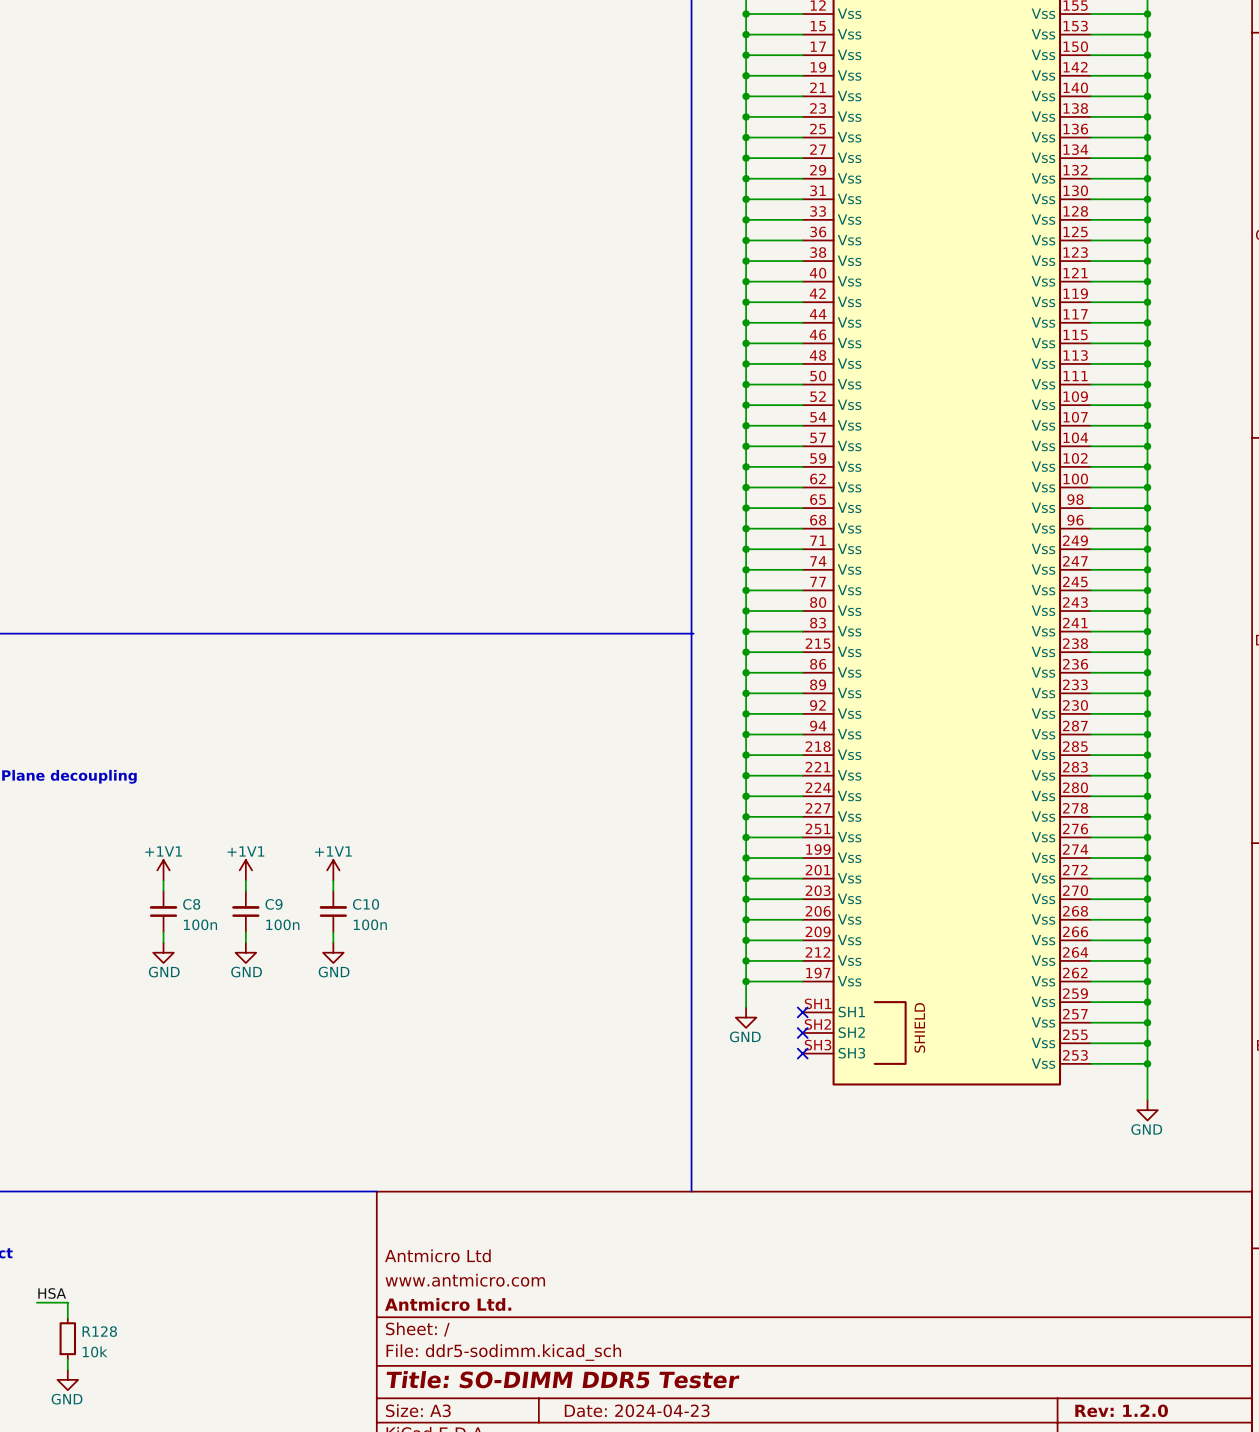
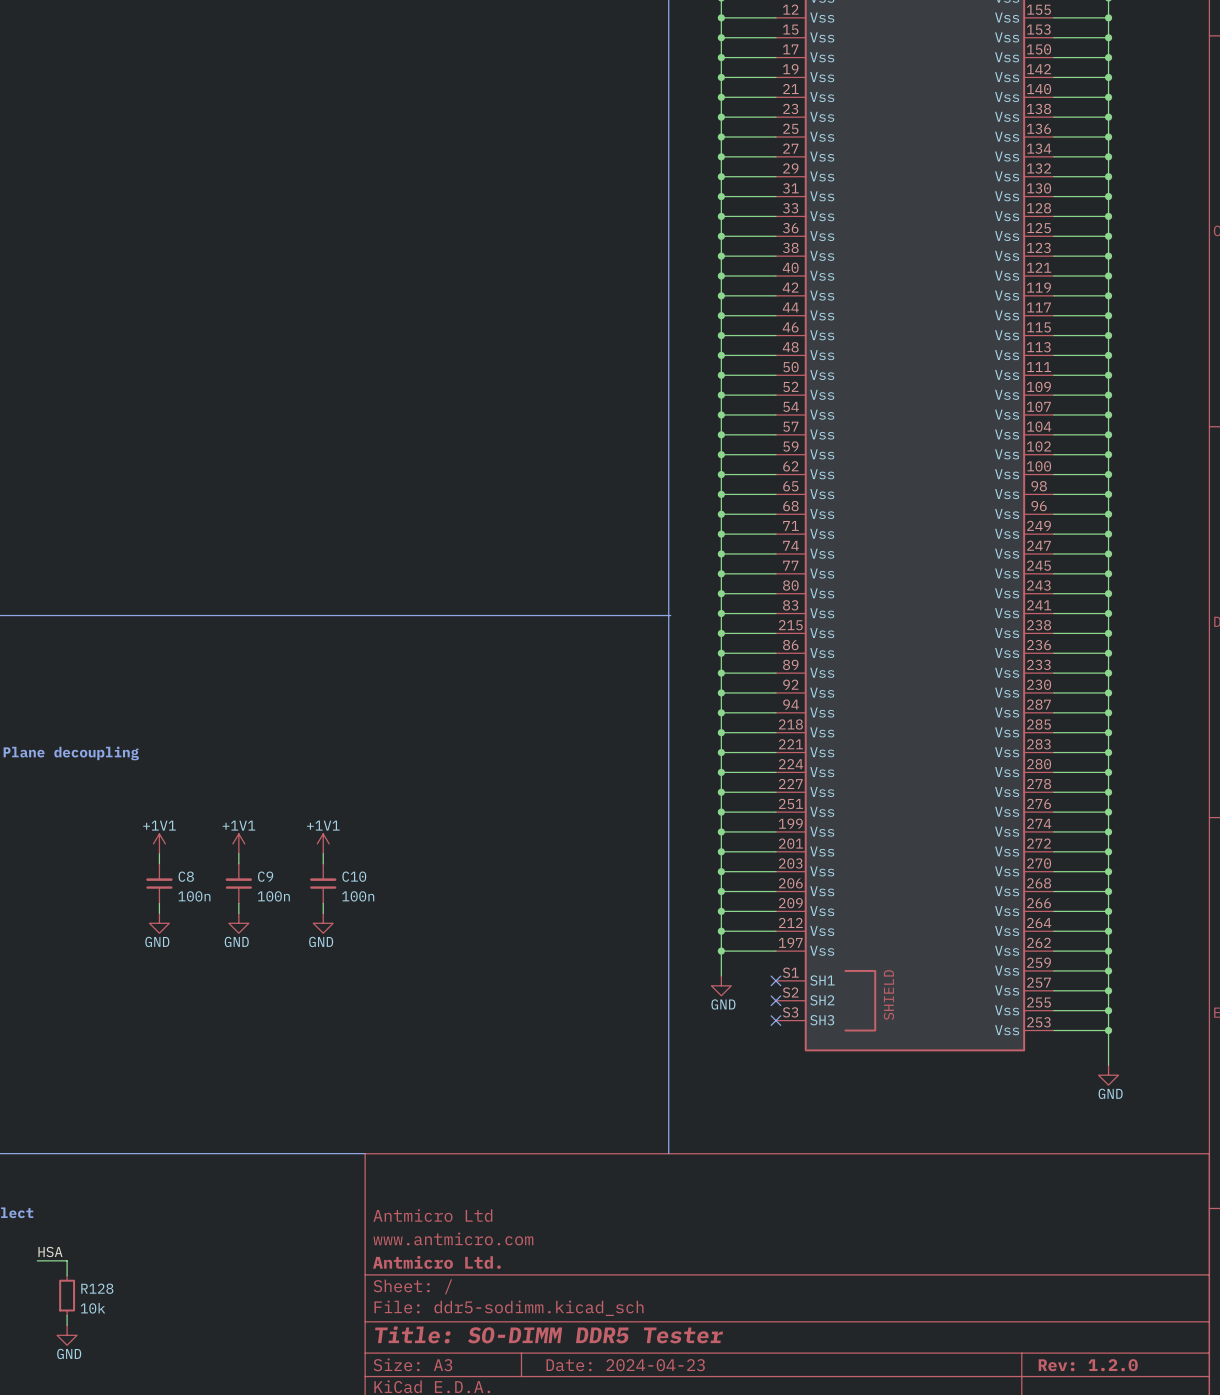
part pin number: SH1 (817, 1003) -> S1 (790, 972)
part pin number: SH2 (817, 1024) -> S2 (790, 992)
part pin number: SH3 (818, 1045) -> S3 (790, 1012)

